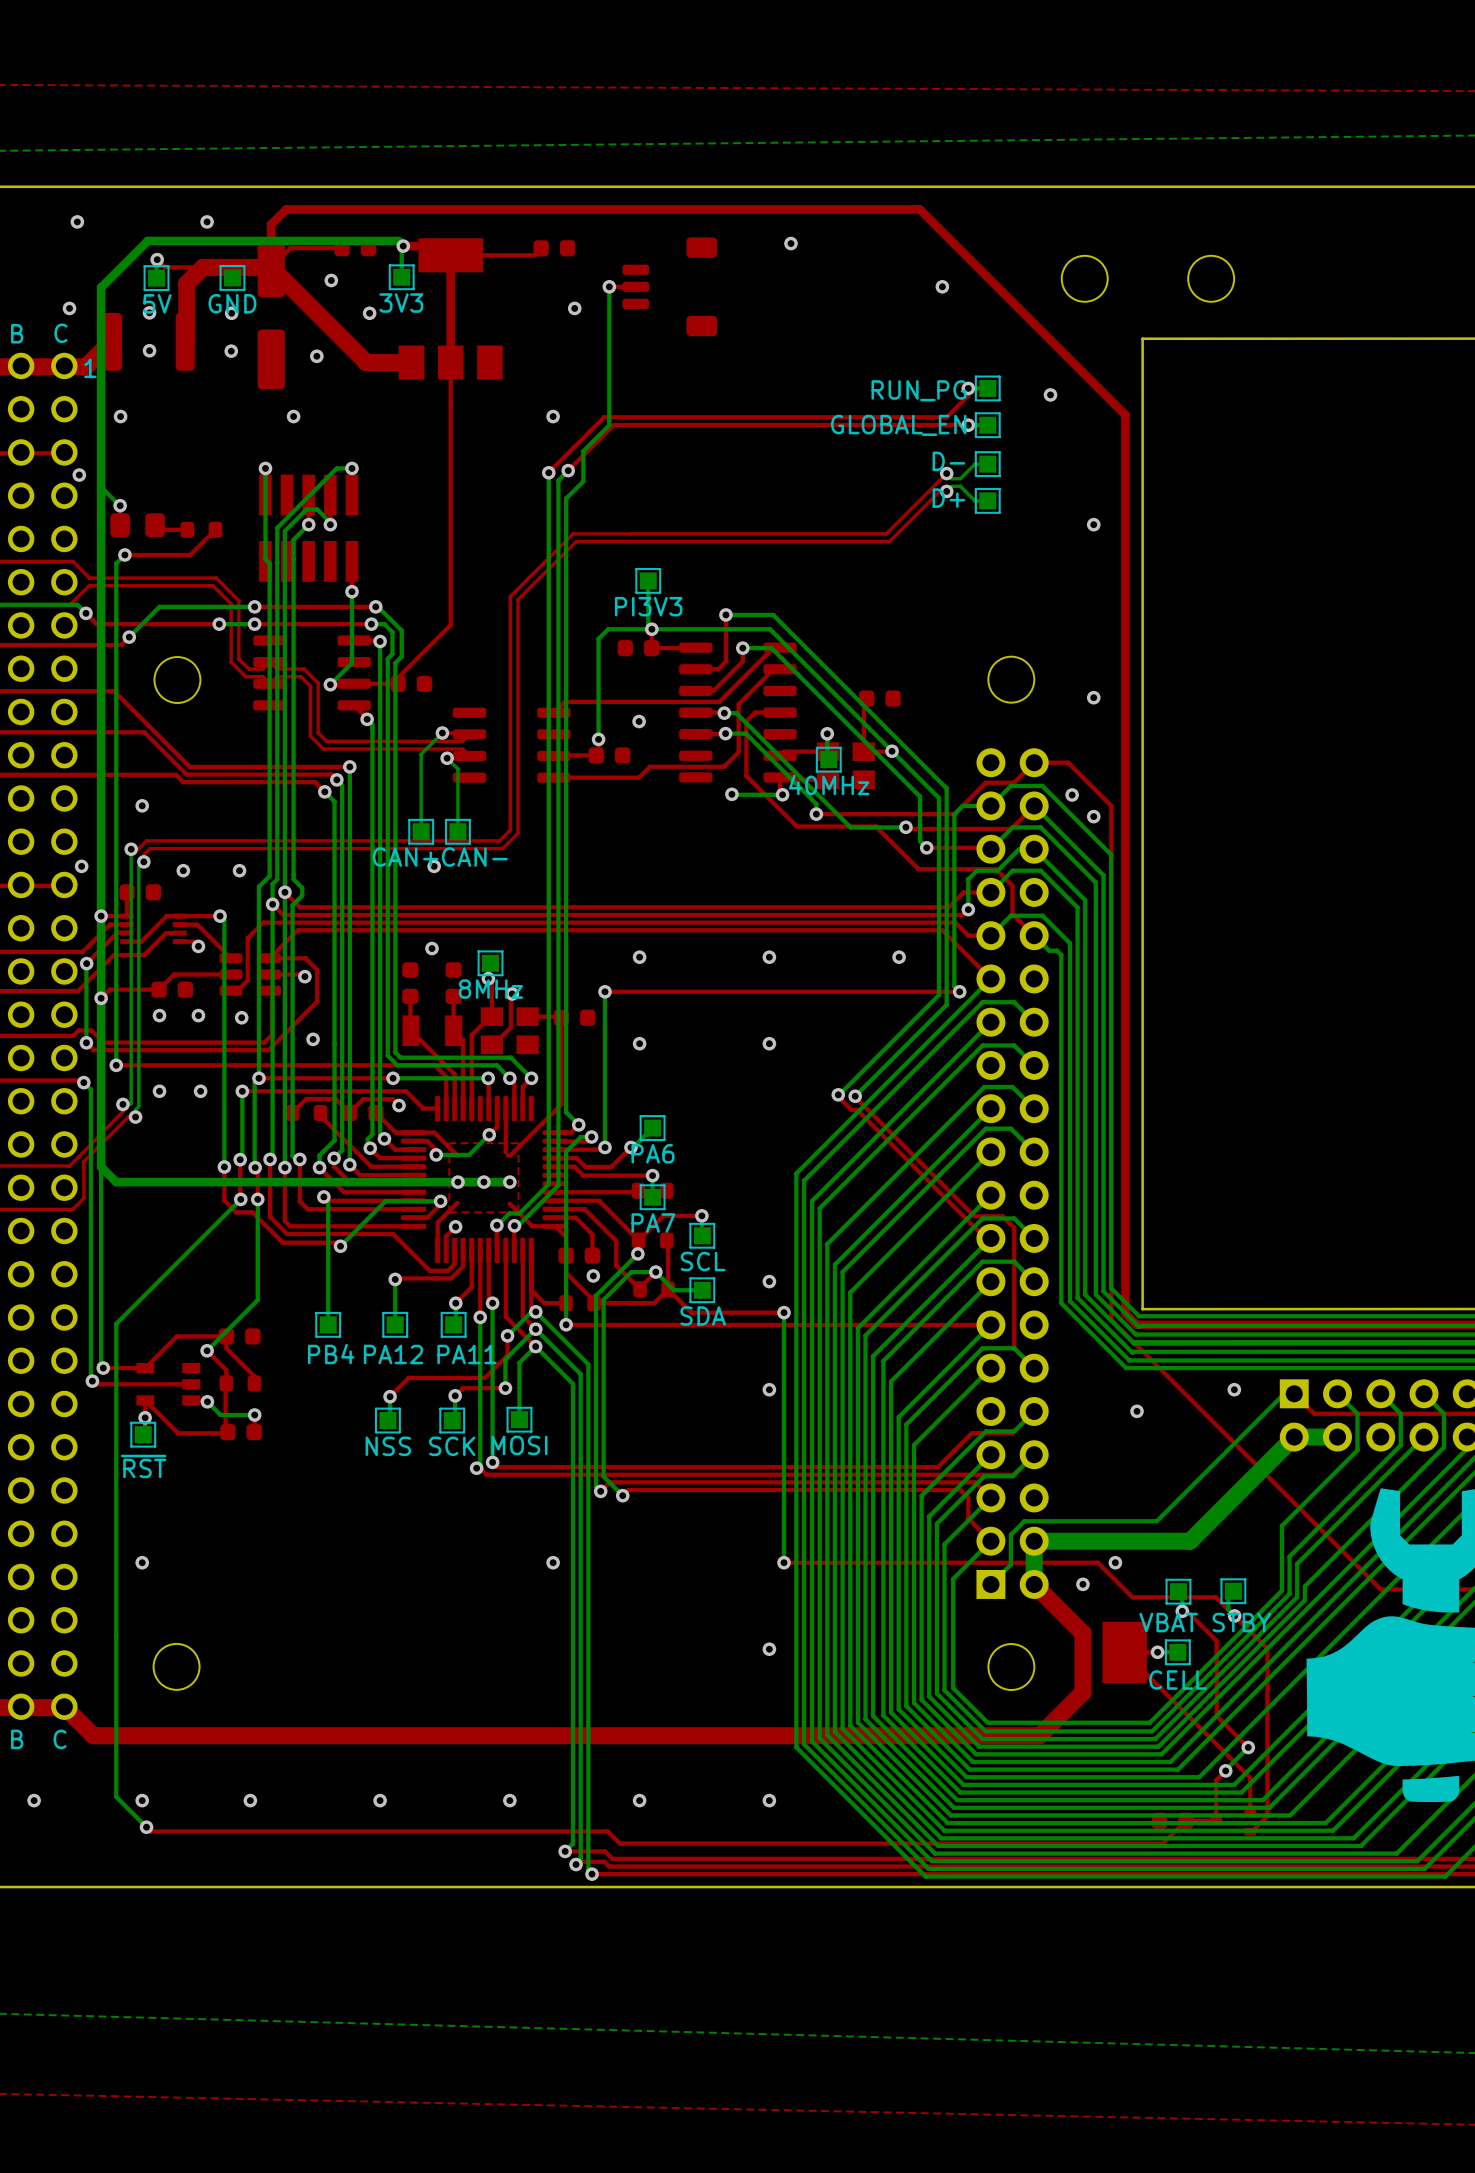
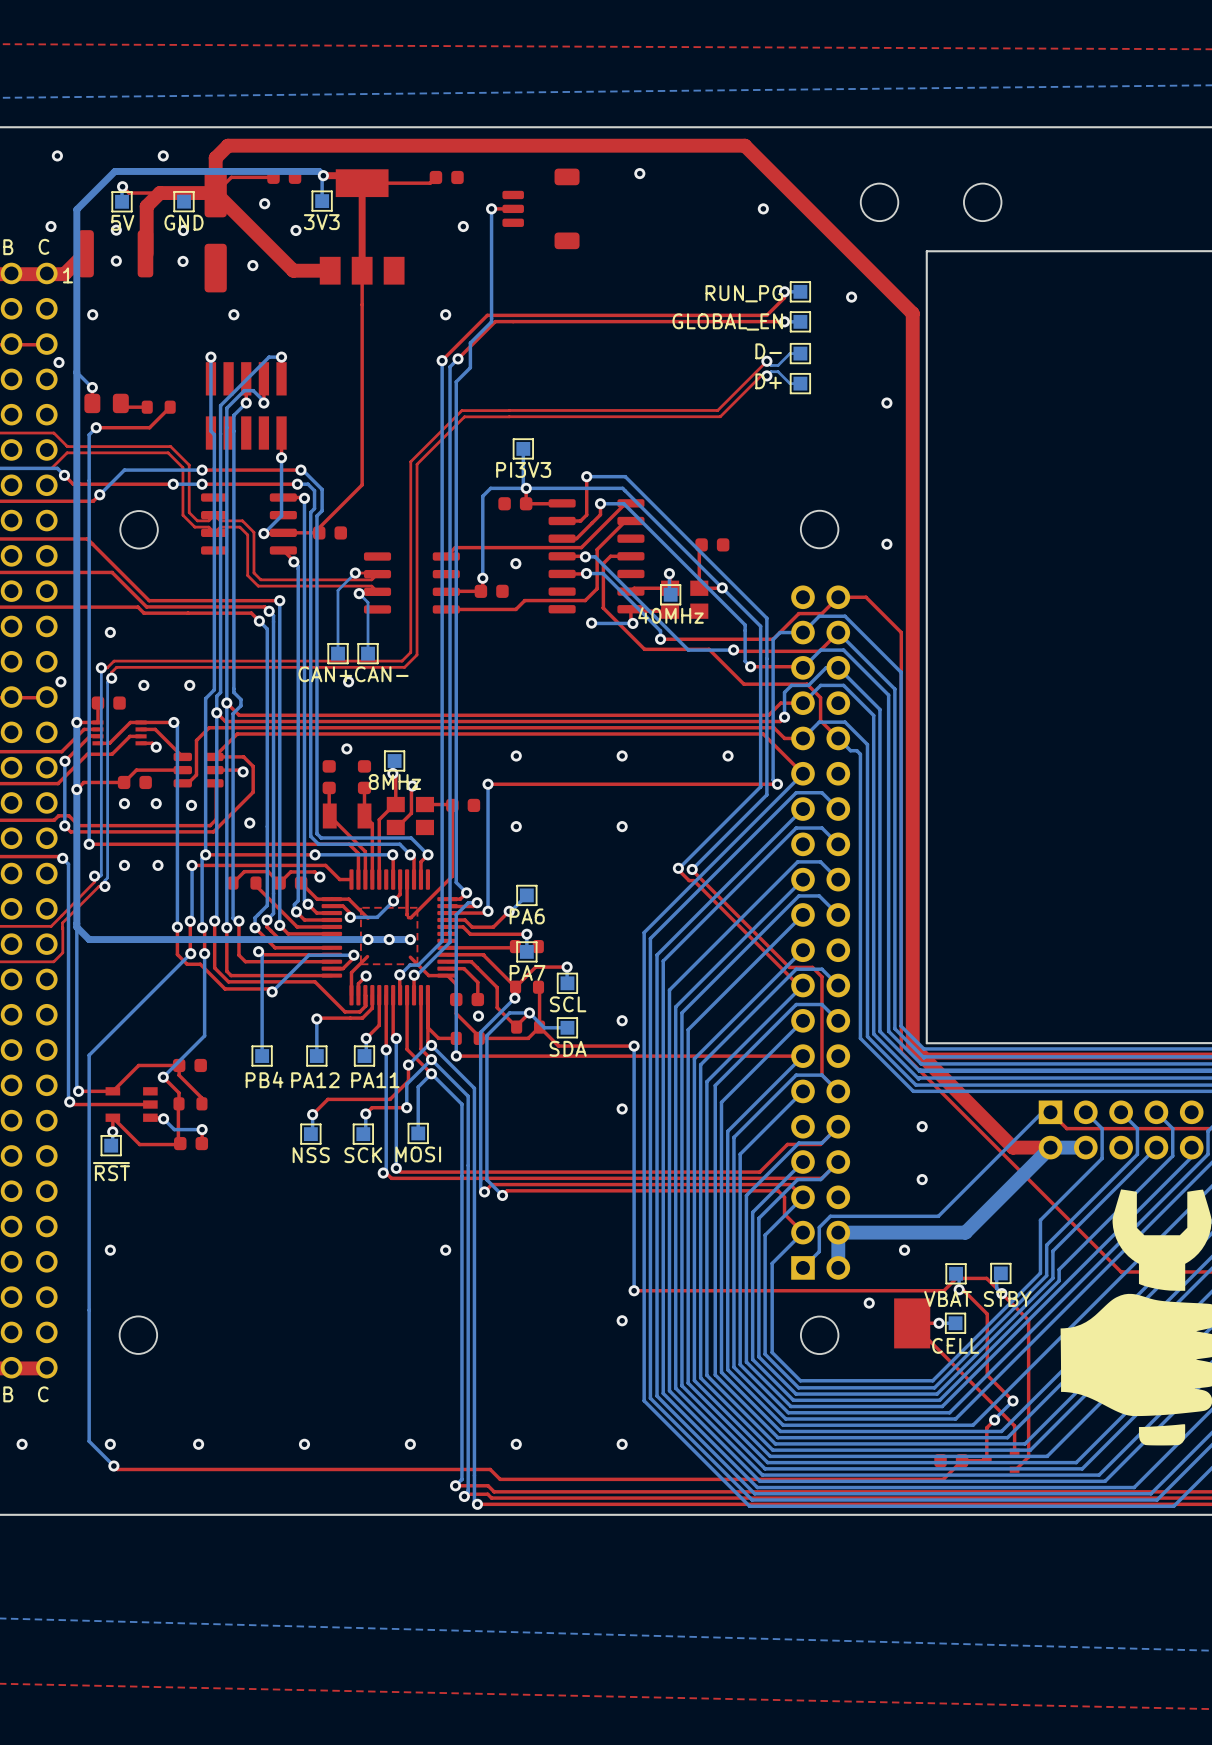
top track width: thin (271, 267) (271, 224) (286, 209) (919, 209) (1125, 415) (1125, 1313) (1136, 1324) -> thick (215, 193) (215, 158) (228, 145) (744, 145) (912, 313) (912, 1046) (921, 1055)
via: (1072, 795) -> none
via: (1093, 816) -> none
top track: none -> (921, 1055) (1012, 1147) (1050, 1147)
via: (1234, 1389) -> none
via: none -> (922, 1179)
top track: (784, 1562) (1097, 1562) (1132, 1597) (1178, 1597) -> (634, 1290) (943, 1290) (956, 1278)
bottom track: none -> (634, 1250) (634, 1290)
via position: (784, 1562) -> (634, 1290)
top track: (1034, 1584) (1082, 1633) (1082, 1692) (1039, 1735) (93, 1735) (64, 1706) -> none
via position: (1082, 1584) -> (869, 1303)

